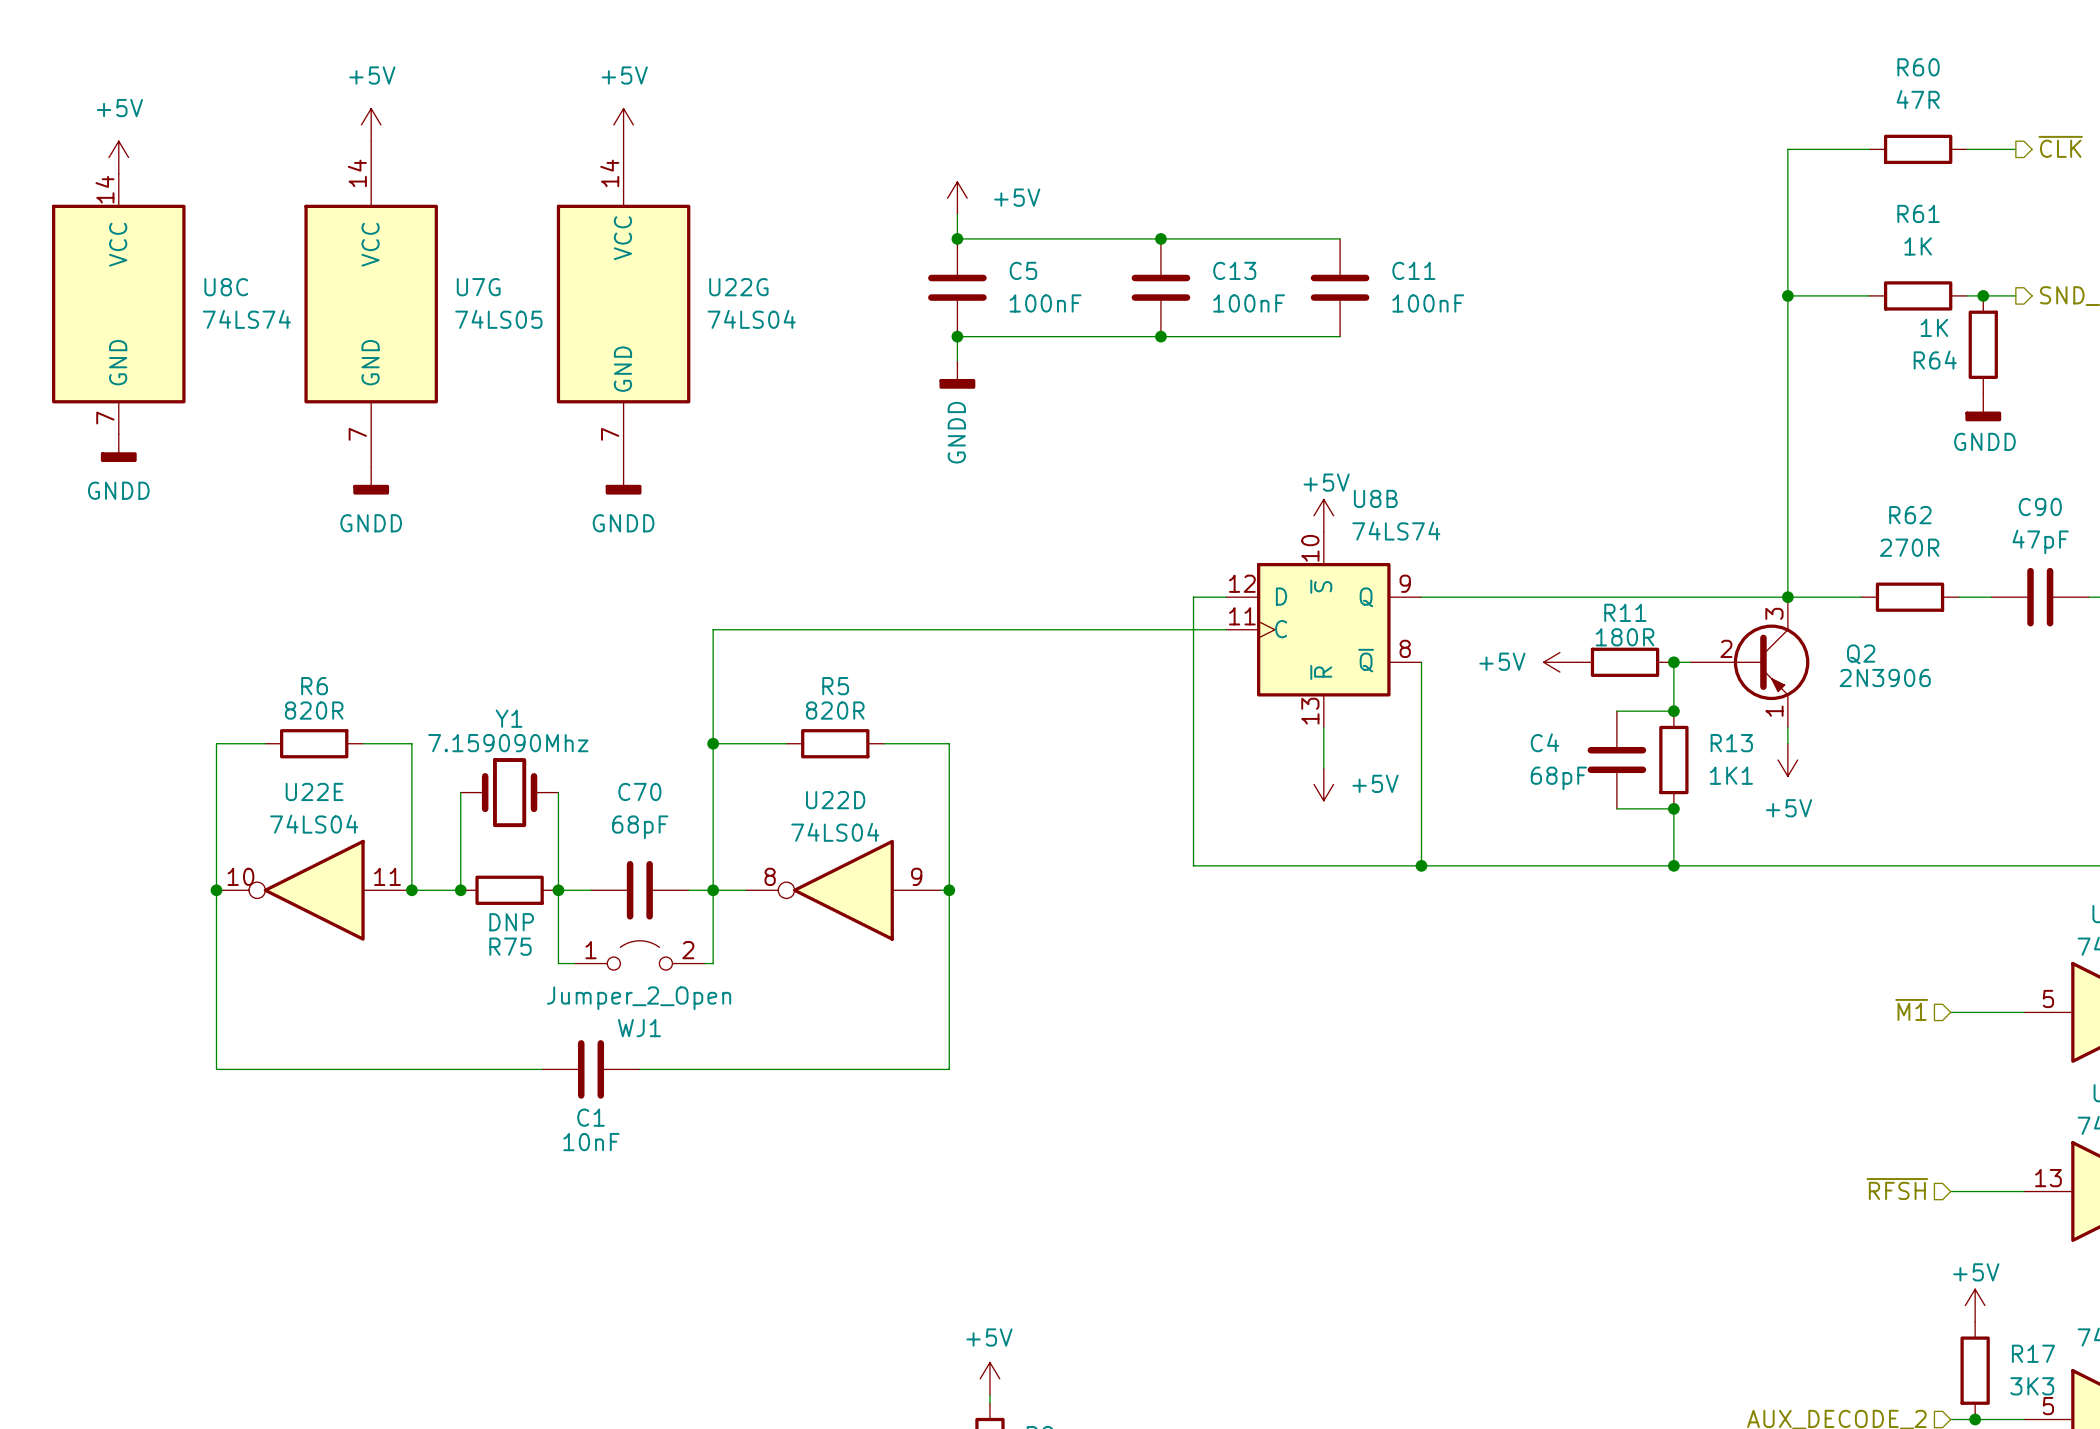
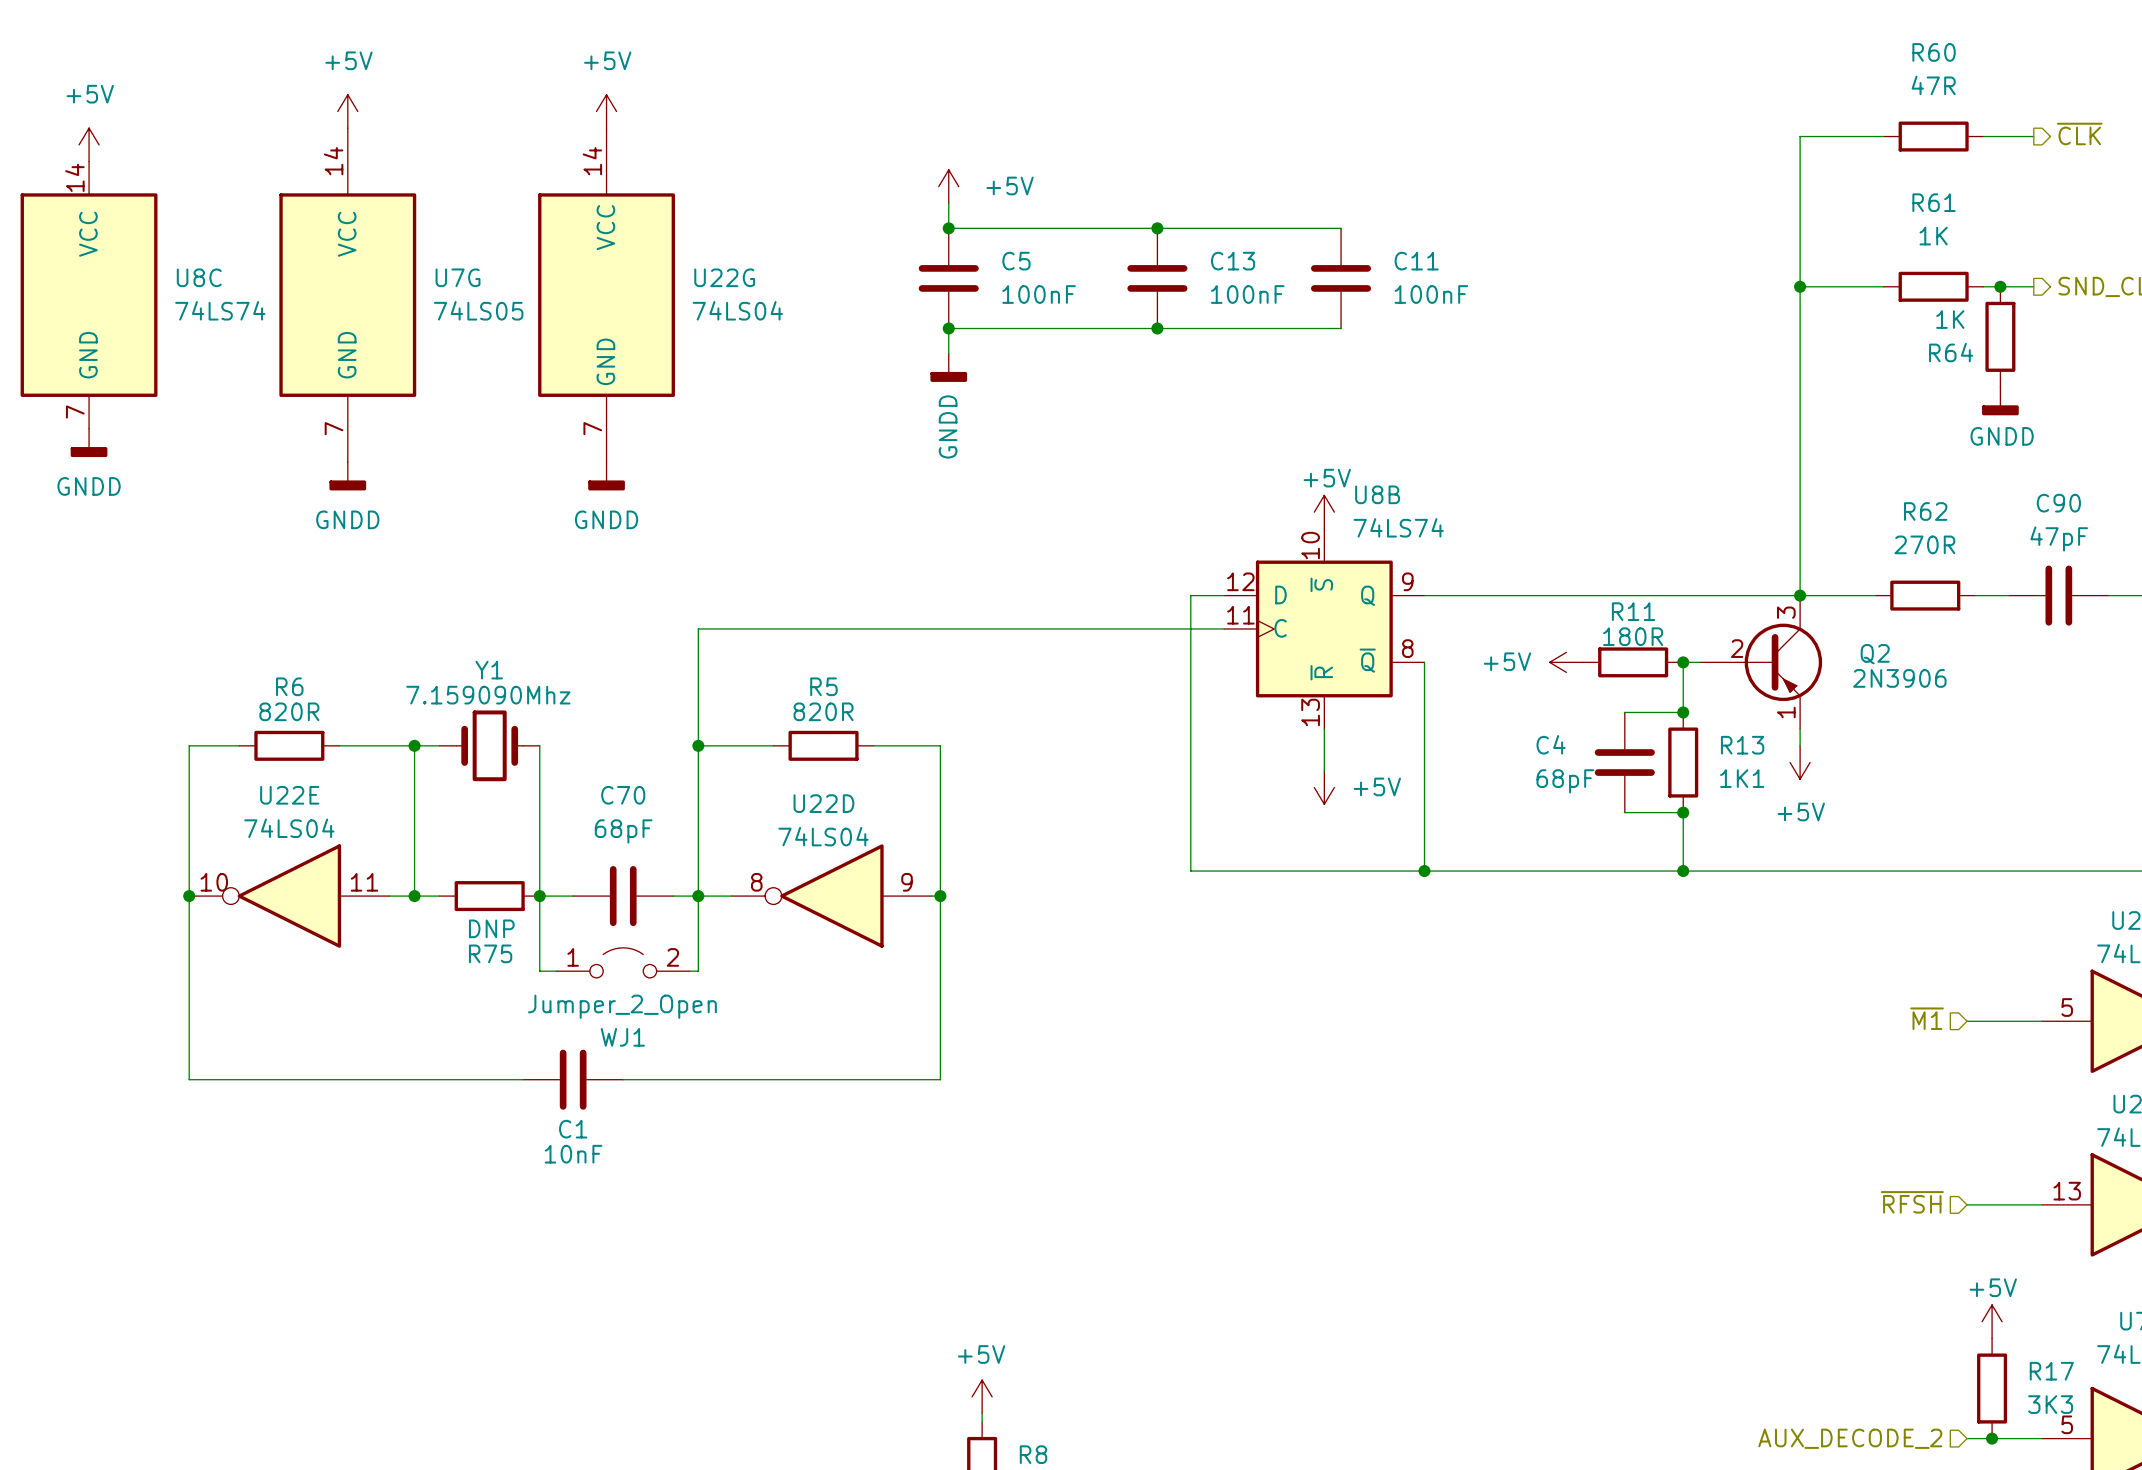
wire: (411, 743) (411, 890) -> (389, 745) (439, 745)
wire: none -> (414, 745) (414, 896)
junction: none -> (414, 745)
wire: none -> (539, 745) (539, 795)
wire: (460, 792) (460, 890) -> none
Y1 position: (509, 792) -> (489, 745)
junction: (411, 890) -> none
junction: none -> (414, 896)
junction: (460, 890) -> none

